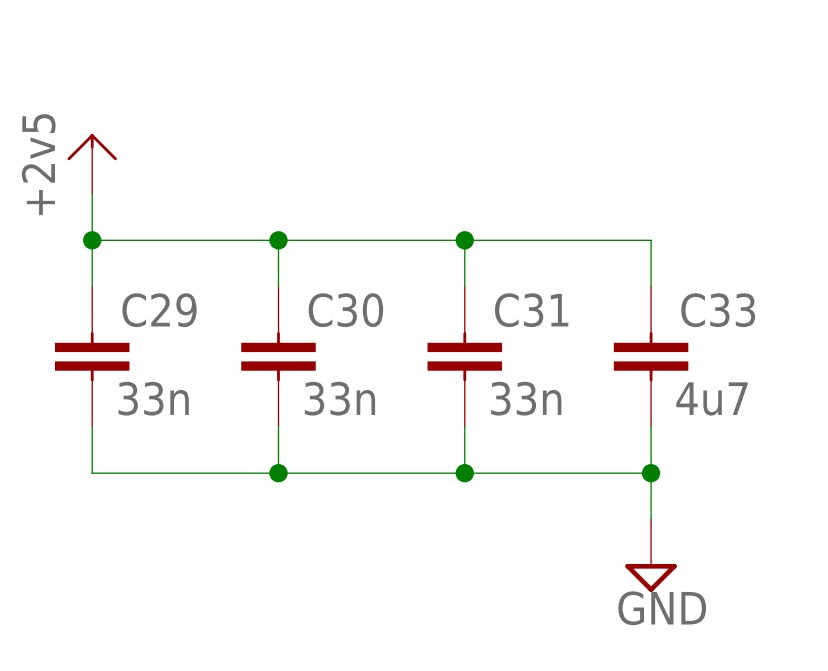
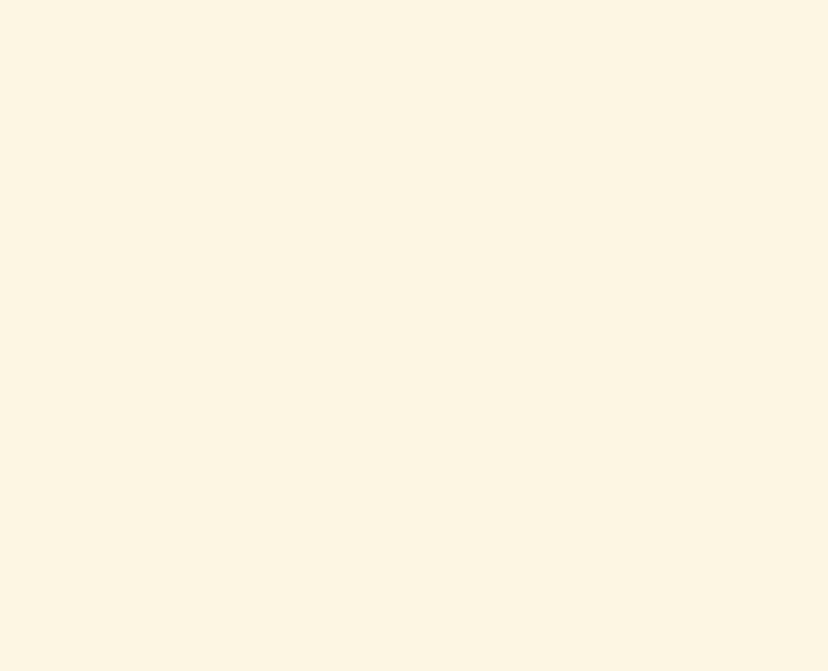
power symbol: (92, 163) -> none
wire: (92, 193) (92, 286) -> none
wire: (92, 240) (651, 240) (651, 286) -> none
junction: (92, 240) -> none
wire: (278, 240) (278, 286) -> none
junction: (278, 240) -> none
wire: (464, 240) (464, 286) -> none
junction: (464, 240) -> none
C29: 33n (92, 356) -> none
C30: 33n (278, 356) -> none
C31: 33n (464, 356) -> none
C33: 4u7 (651, 356) -> none
wire: (92, 426) (92, 473) (651, 473) -> none
wire: (278, 426) (278, 473) -> none
wire: (464, 426) (464, 473) -> none
wire: (651, 426) (651, 519) -> none
junction: (278, 473) -> none
junction: (464, 473) -> none
junction: (651, 473) -> none
power symbol: GND (651, 555) -> none

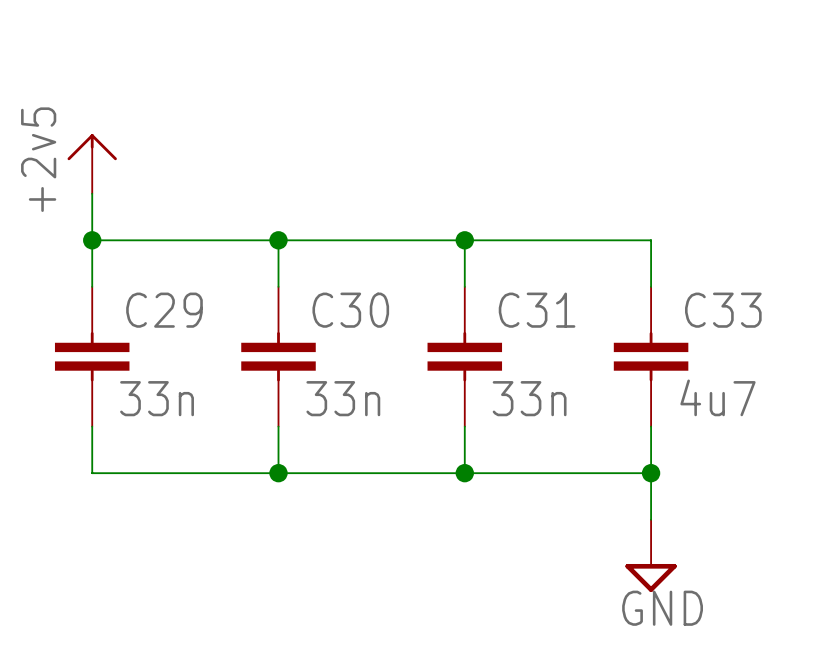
power symbol: none -> (92, 163)
wire: none -> (92, 193) (92, 286)
wire: none -> (92, 240) (651, 240) (651, 286)
junction: none -> (92, 240)
wire: none -> (278, 240) (278, 286)
junction: none -> (278, 240)
wire: none -> (464, 240) (464, 286)
junction: none -> (464, 240)
C29: none -> 33n (92, 356)
C30: none -> 33n (278, 356)
C31: none -> 33n (464, 356)
C33: none -> 4u7 (651, 356)
wire: none -> (92, 426) (92, 473) (651, 473)
wire: none -> (278, 426) (278, 473)
wire: none -> (464, 426) (464, 473)
wire: none -> (651, 426) (651, 519)
junction: none -> (278, 473)
junction: none -> (464, 473)
junction: none -> (651, 473)
power symbol: none -> GND (651, 555)

